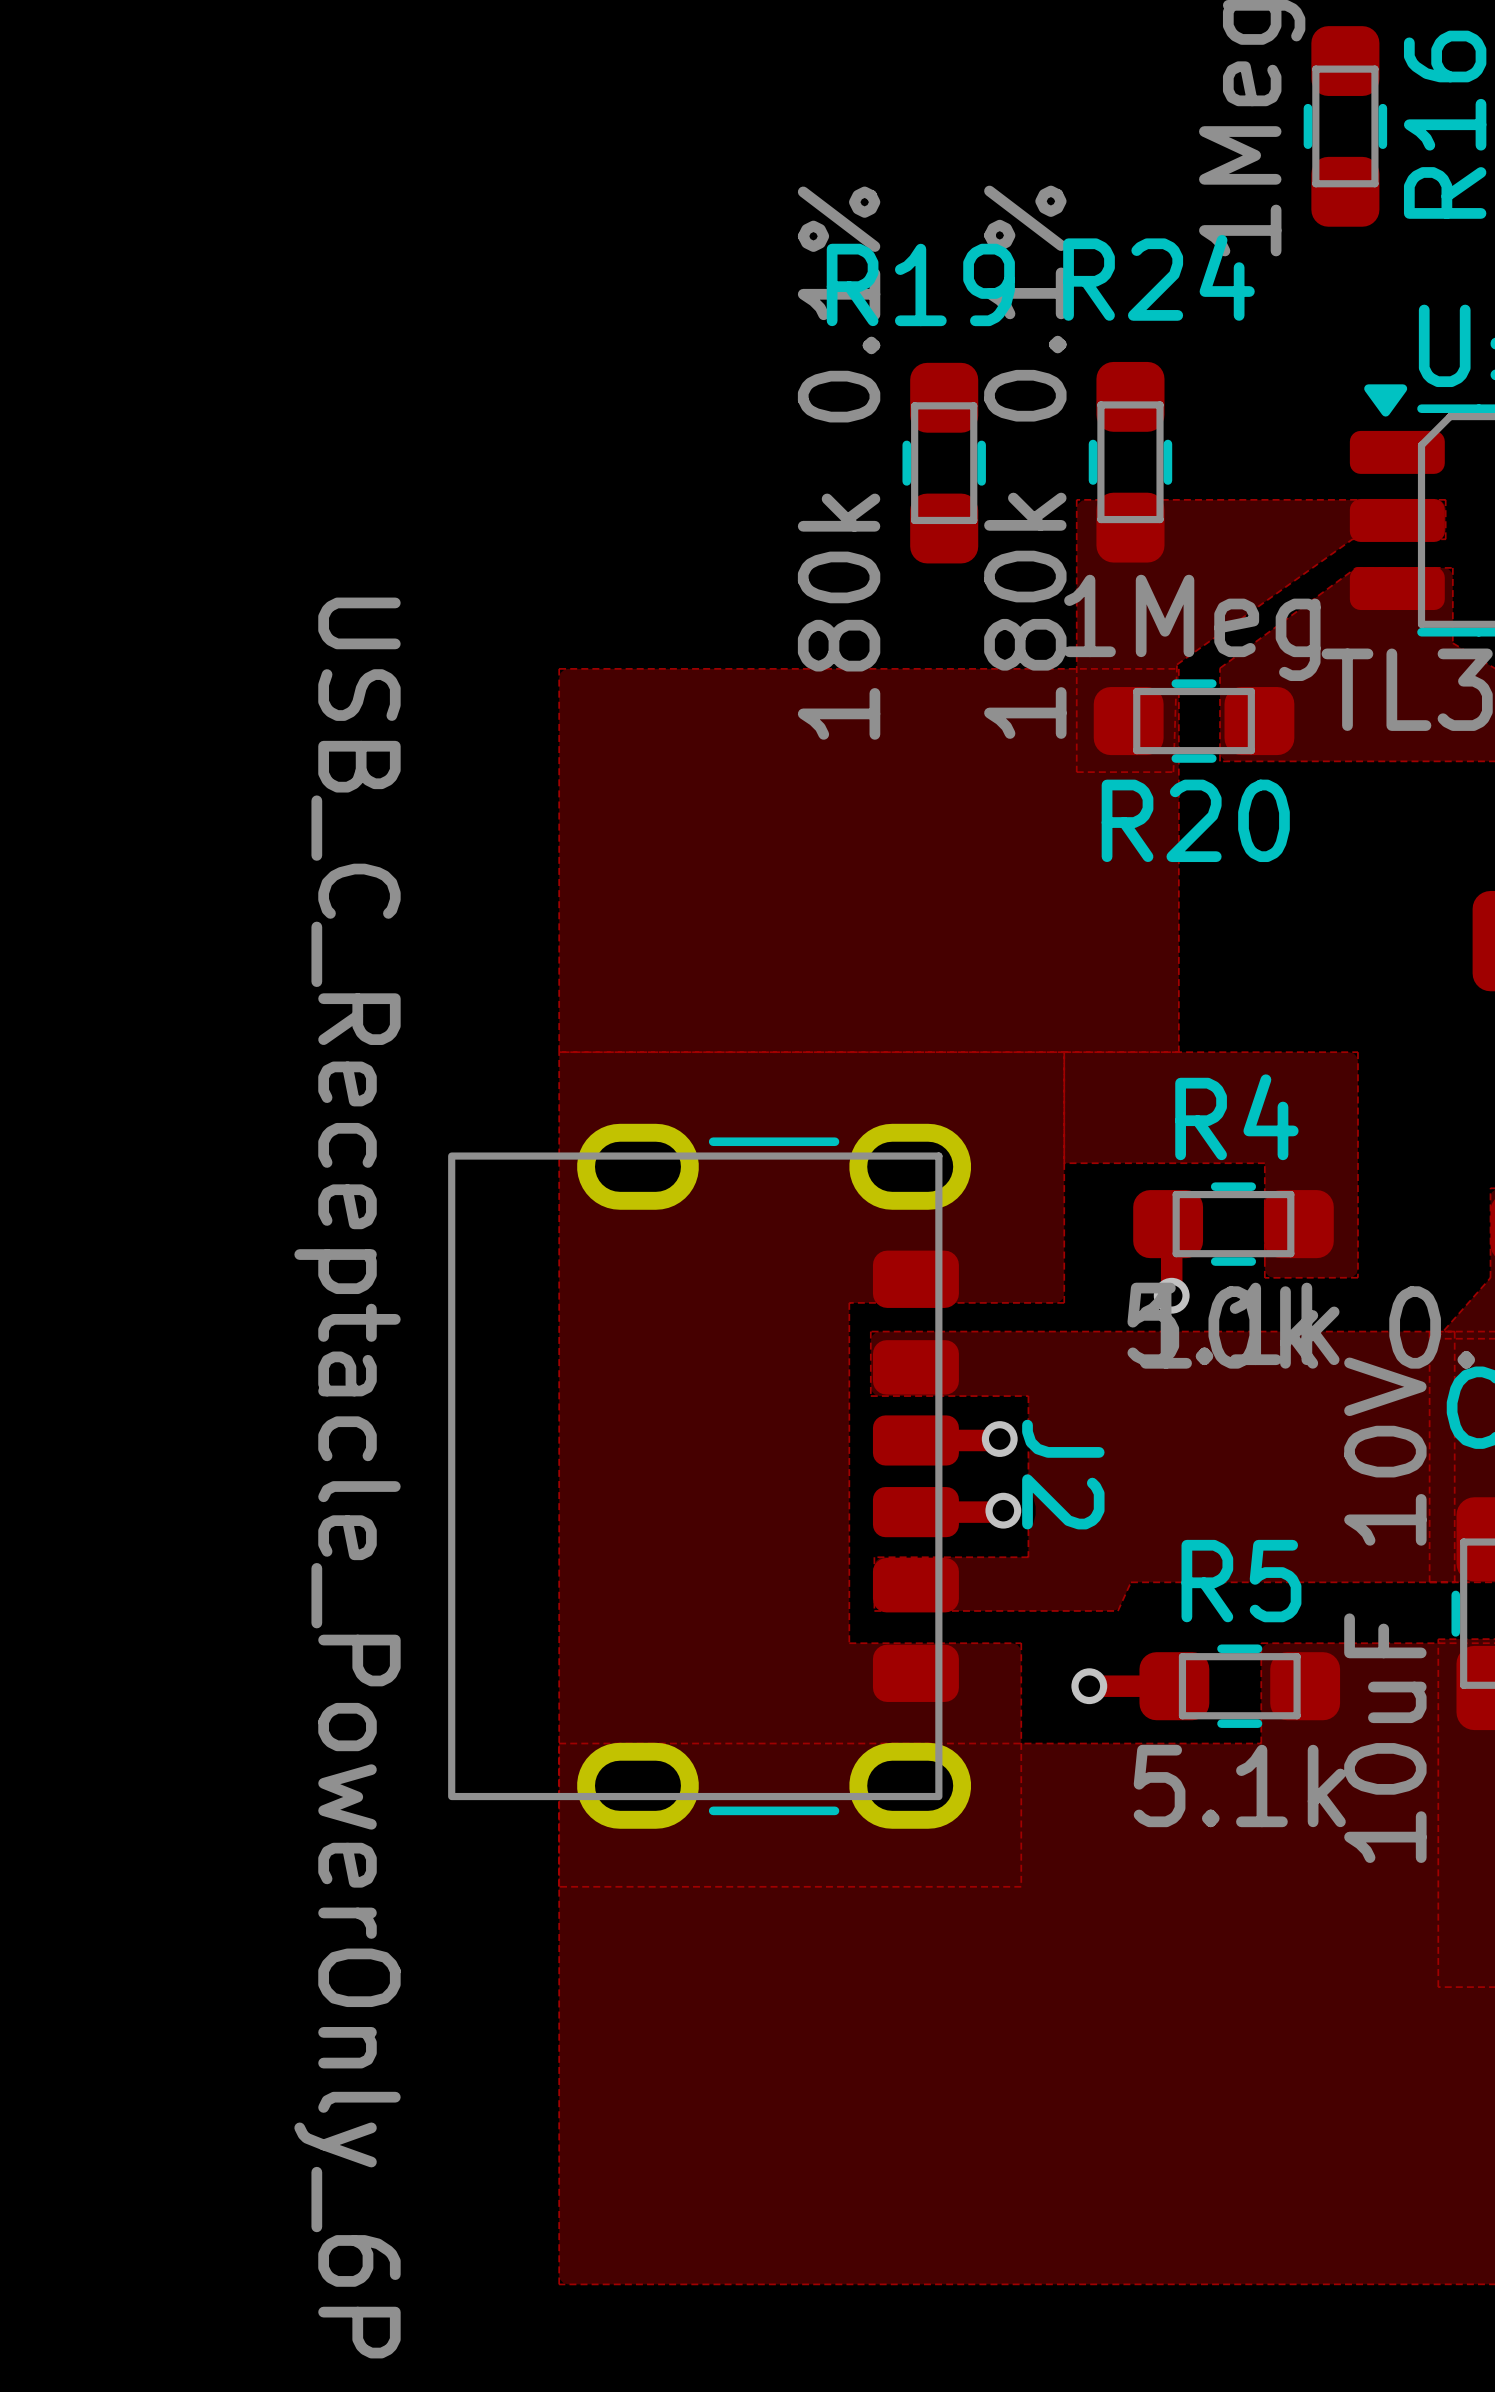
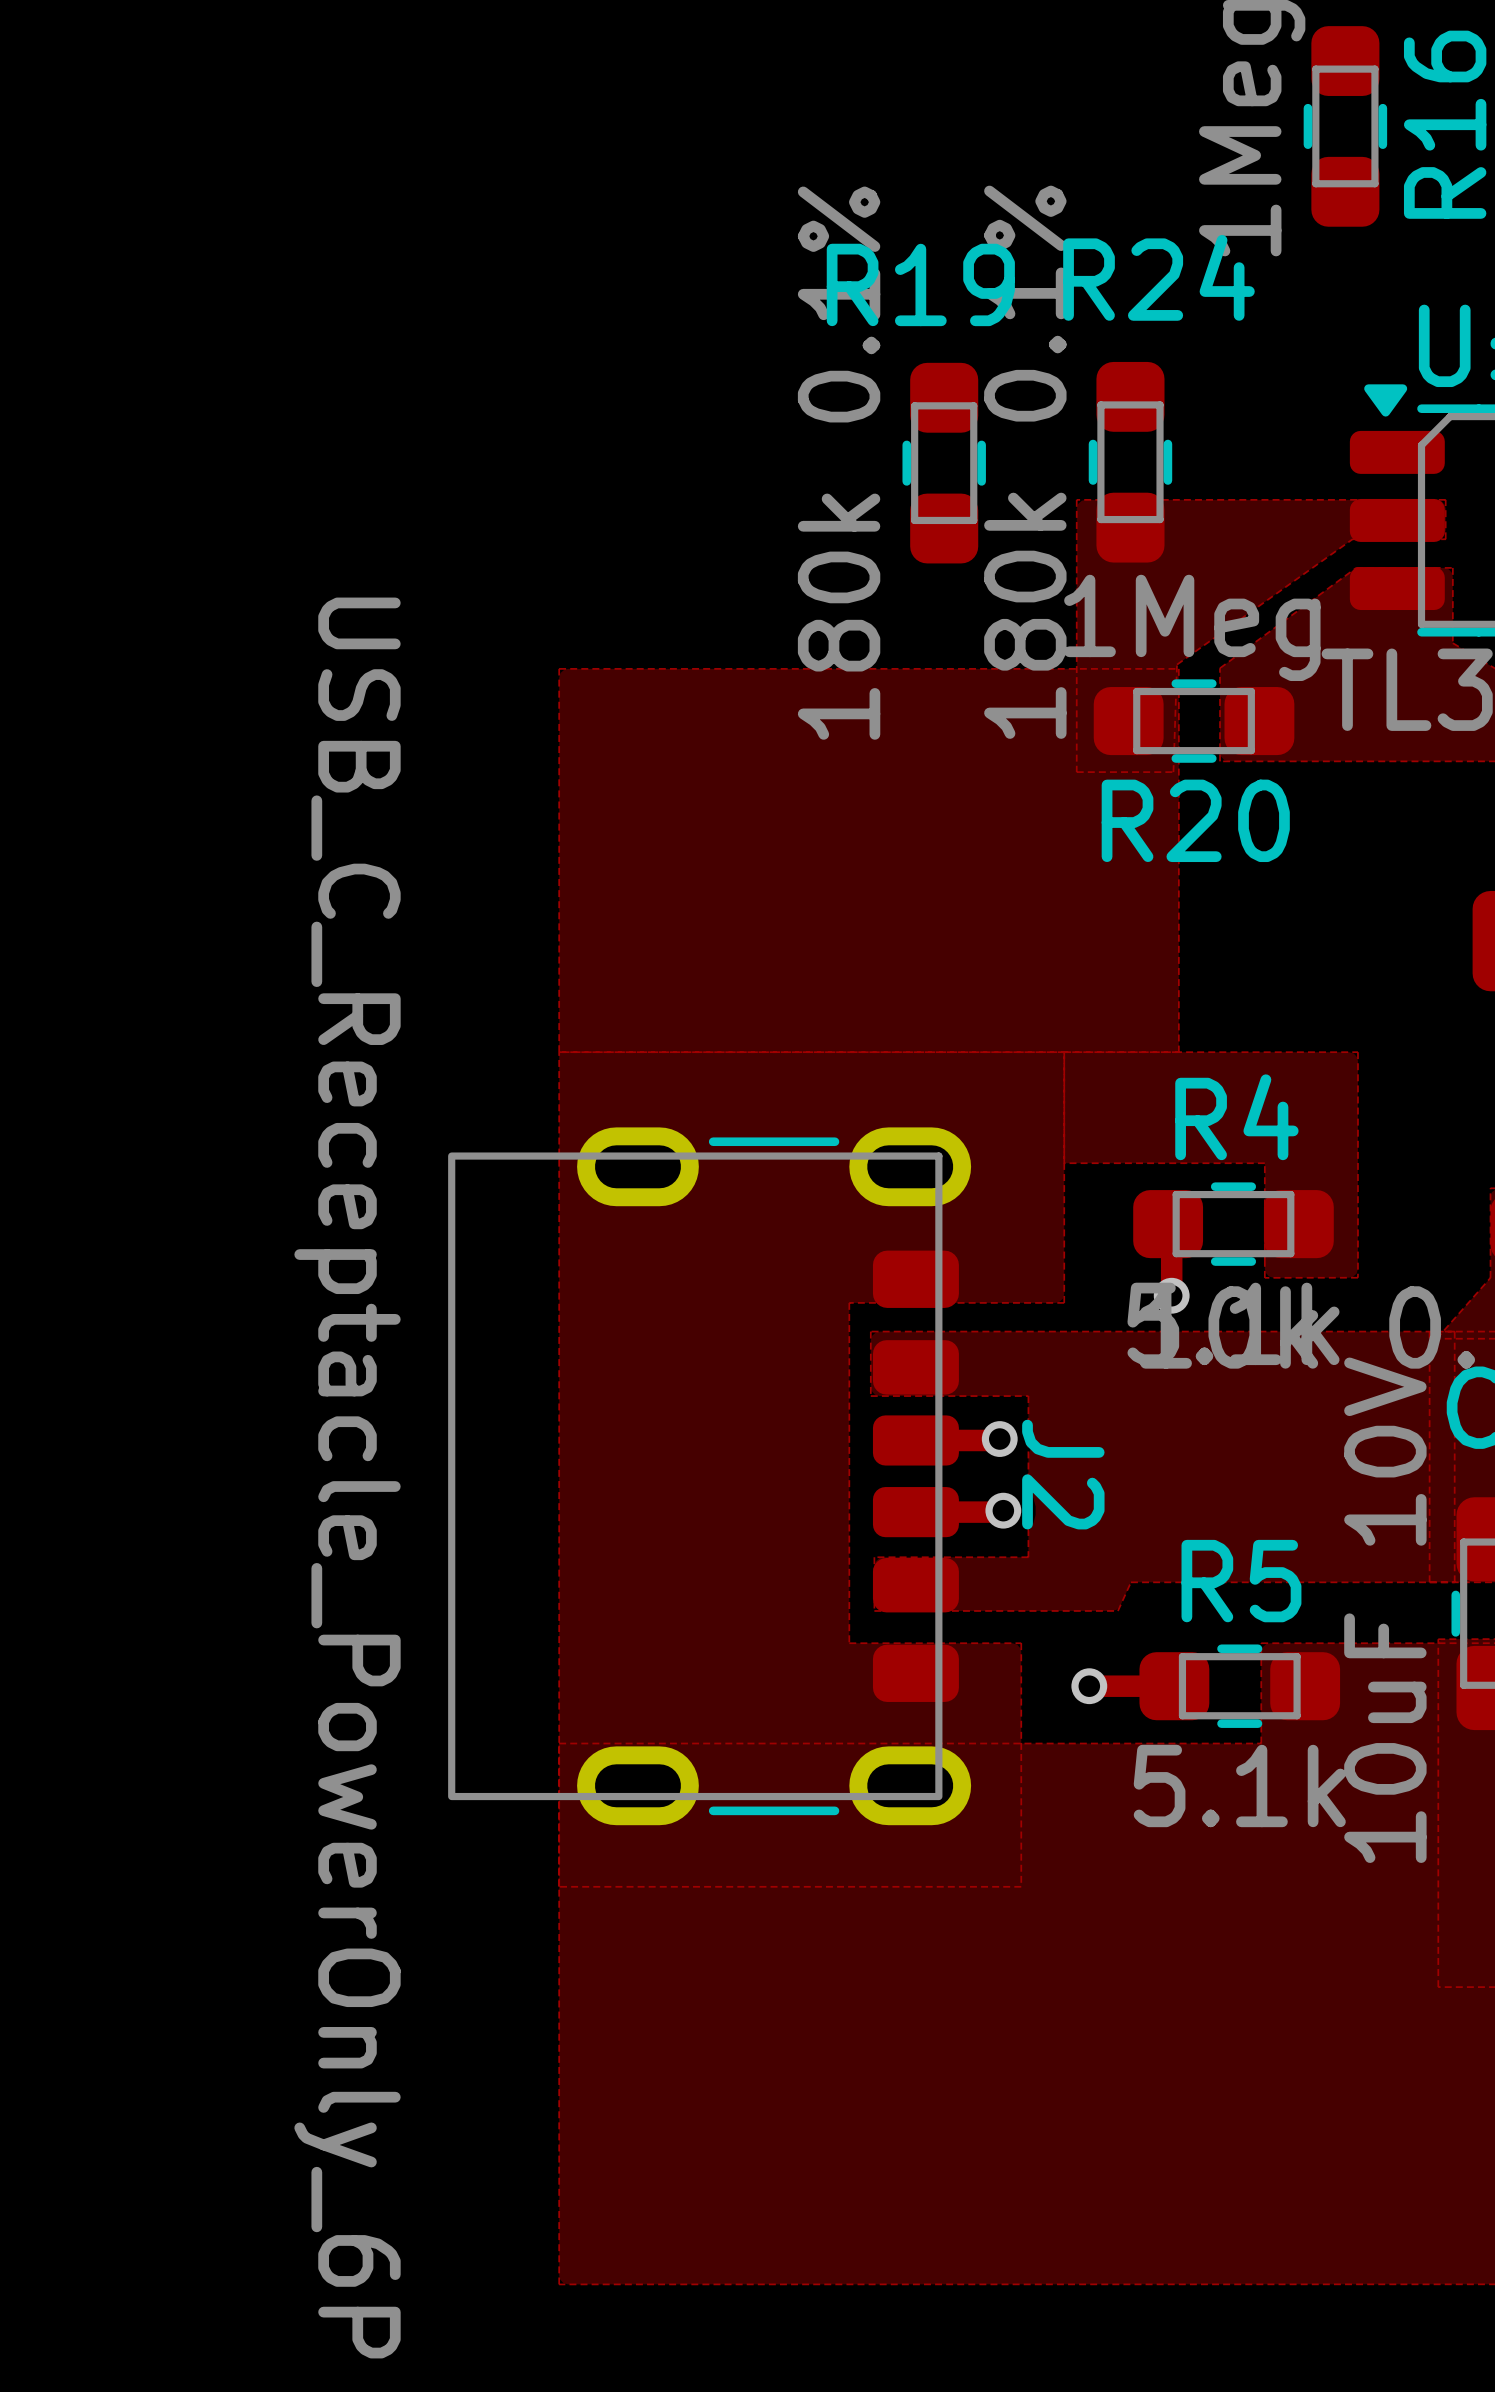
J2 footprint: [448, 1123, 972, 1829] -> [448, 1127, 972, 1826]

